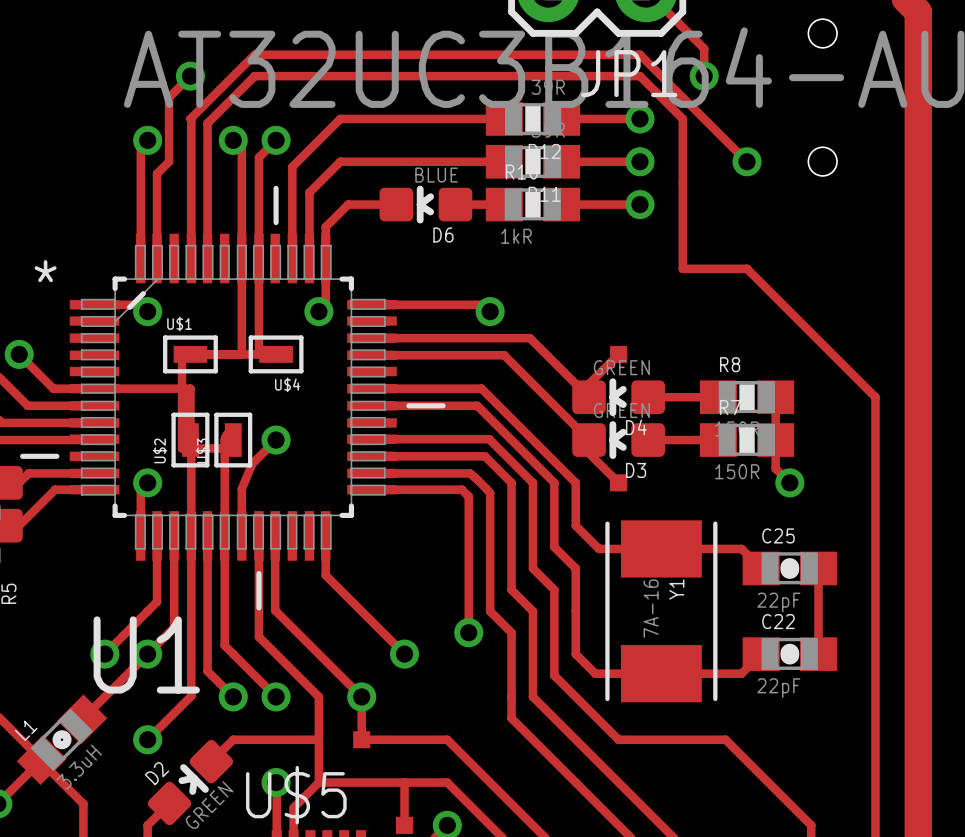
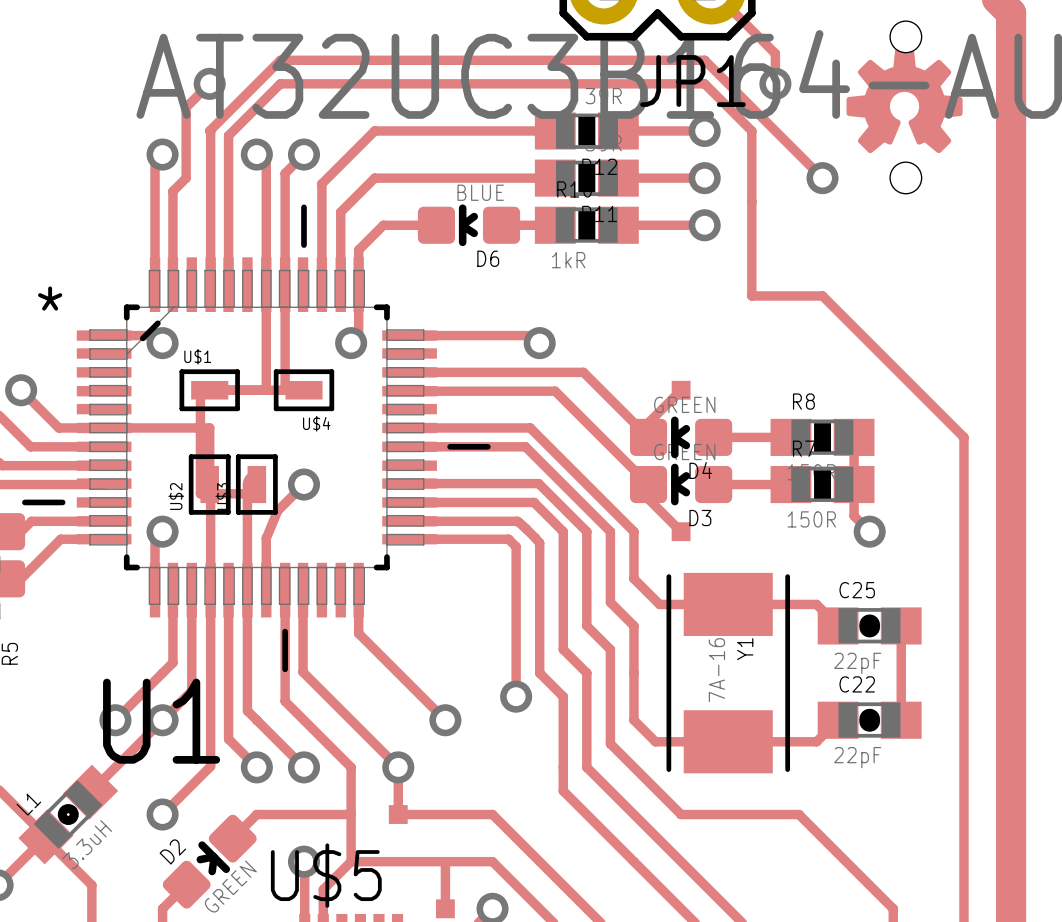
drawing: none -> [846, 48, 963, 154]

